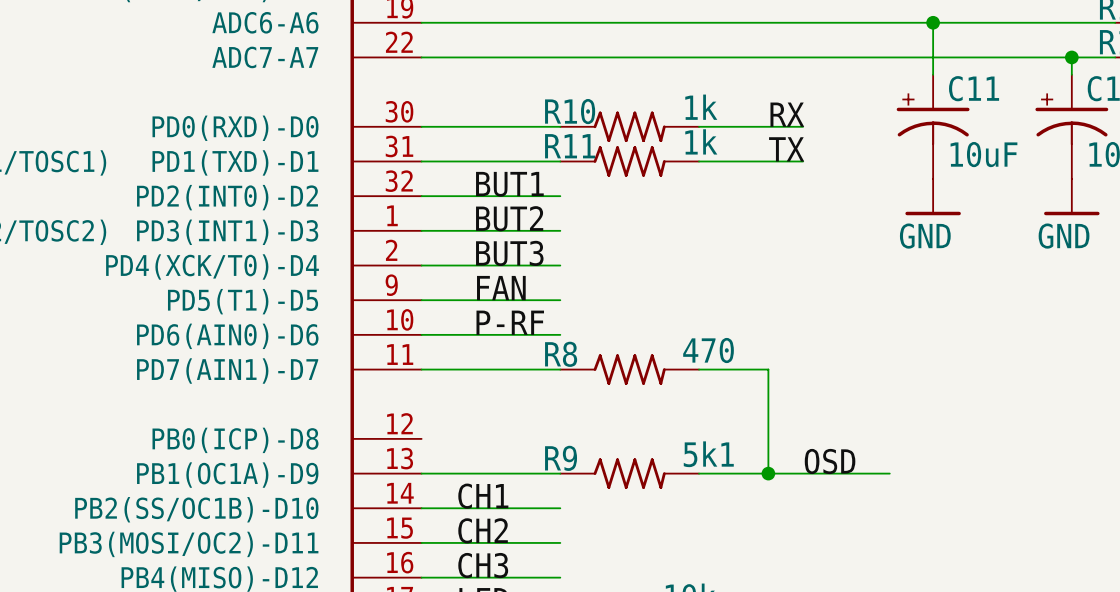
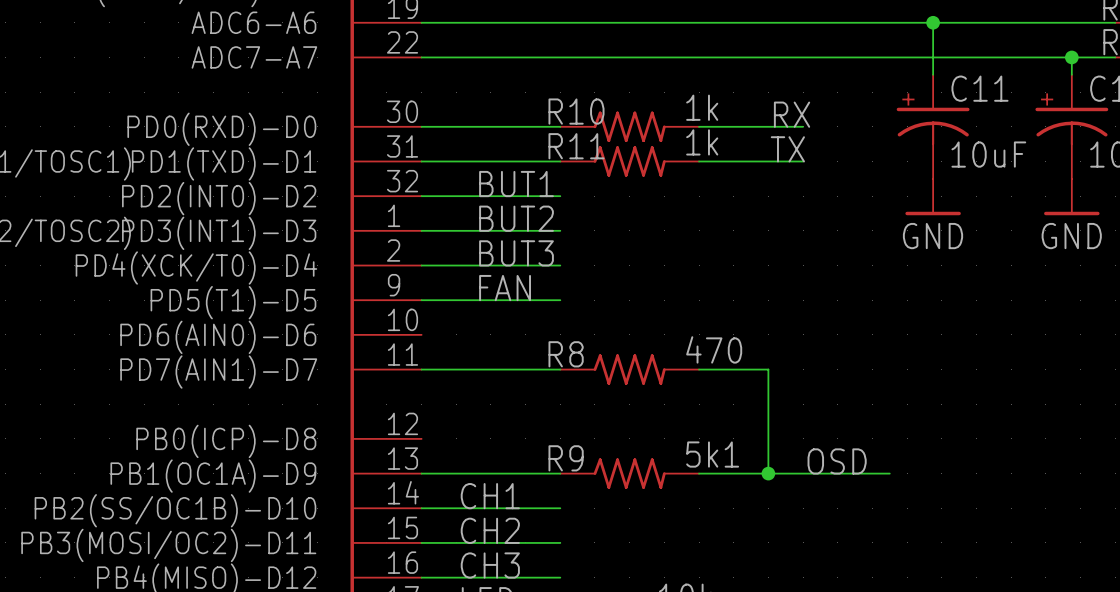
label: P-RF (510, 322) -> none
wire: (421, 334) (560, 334) -> none

